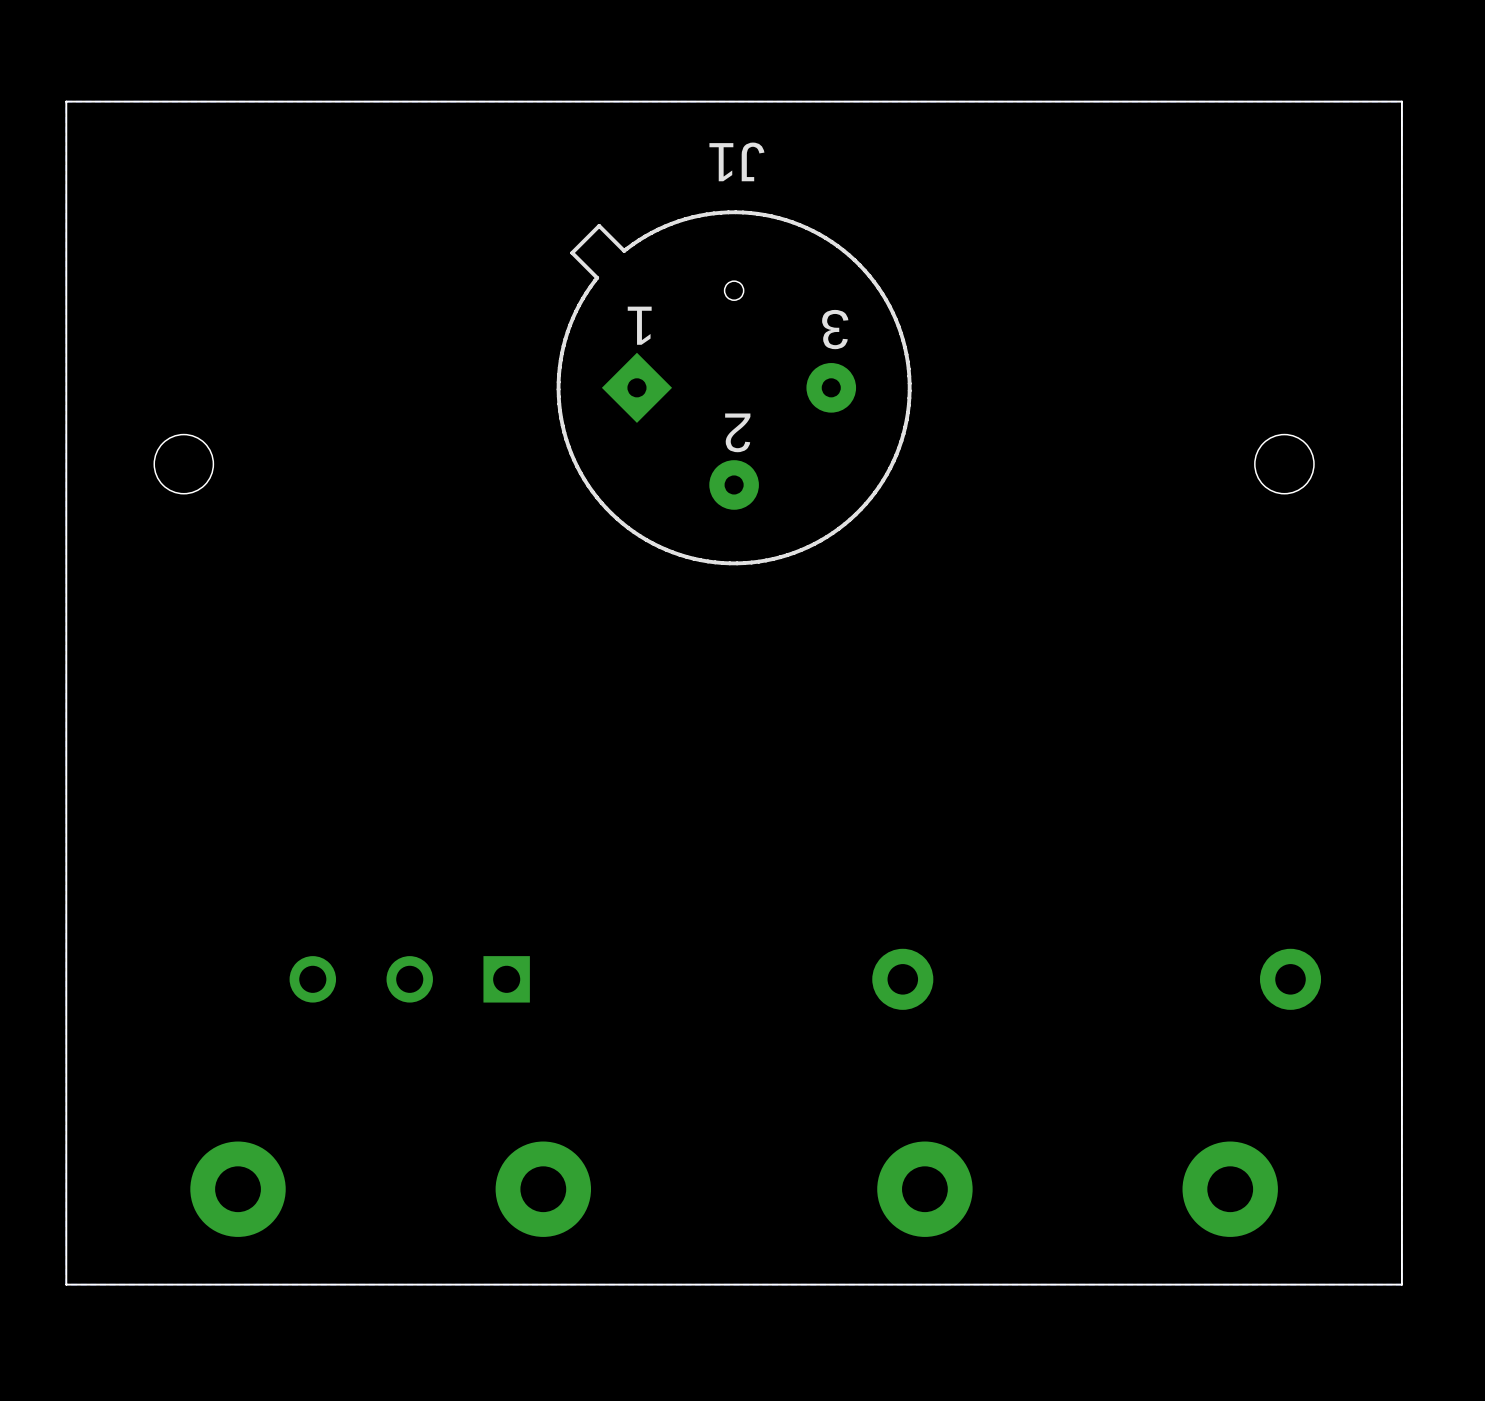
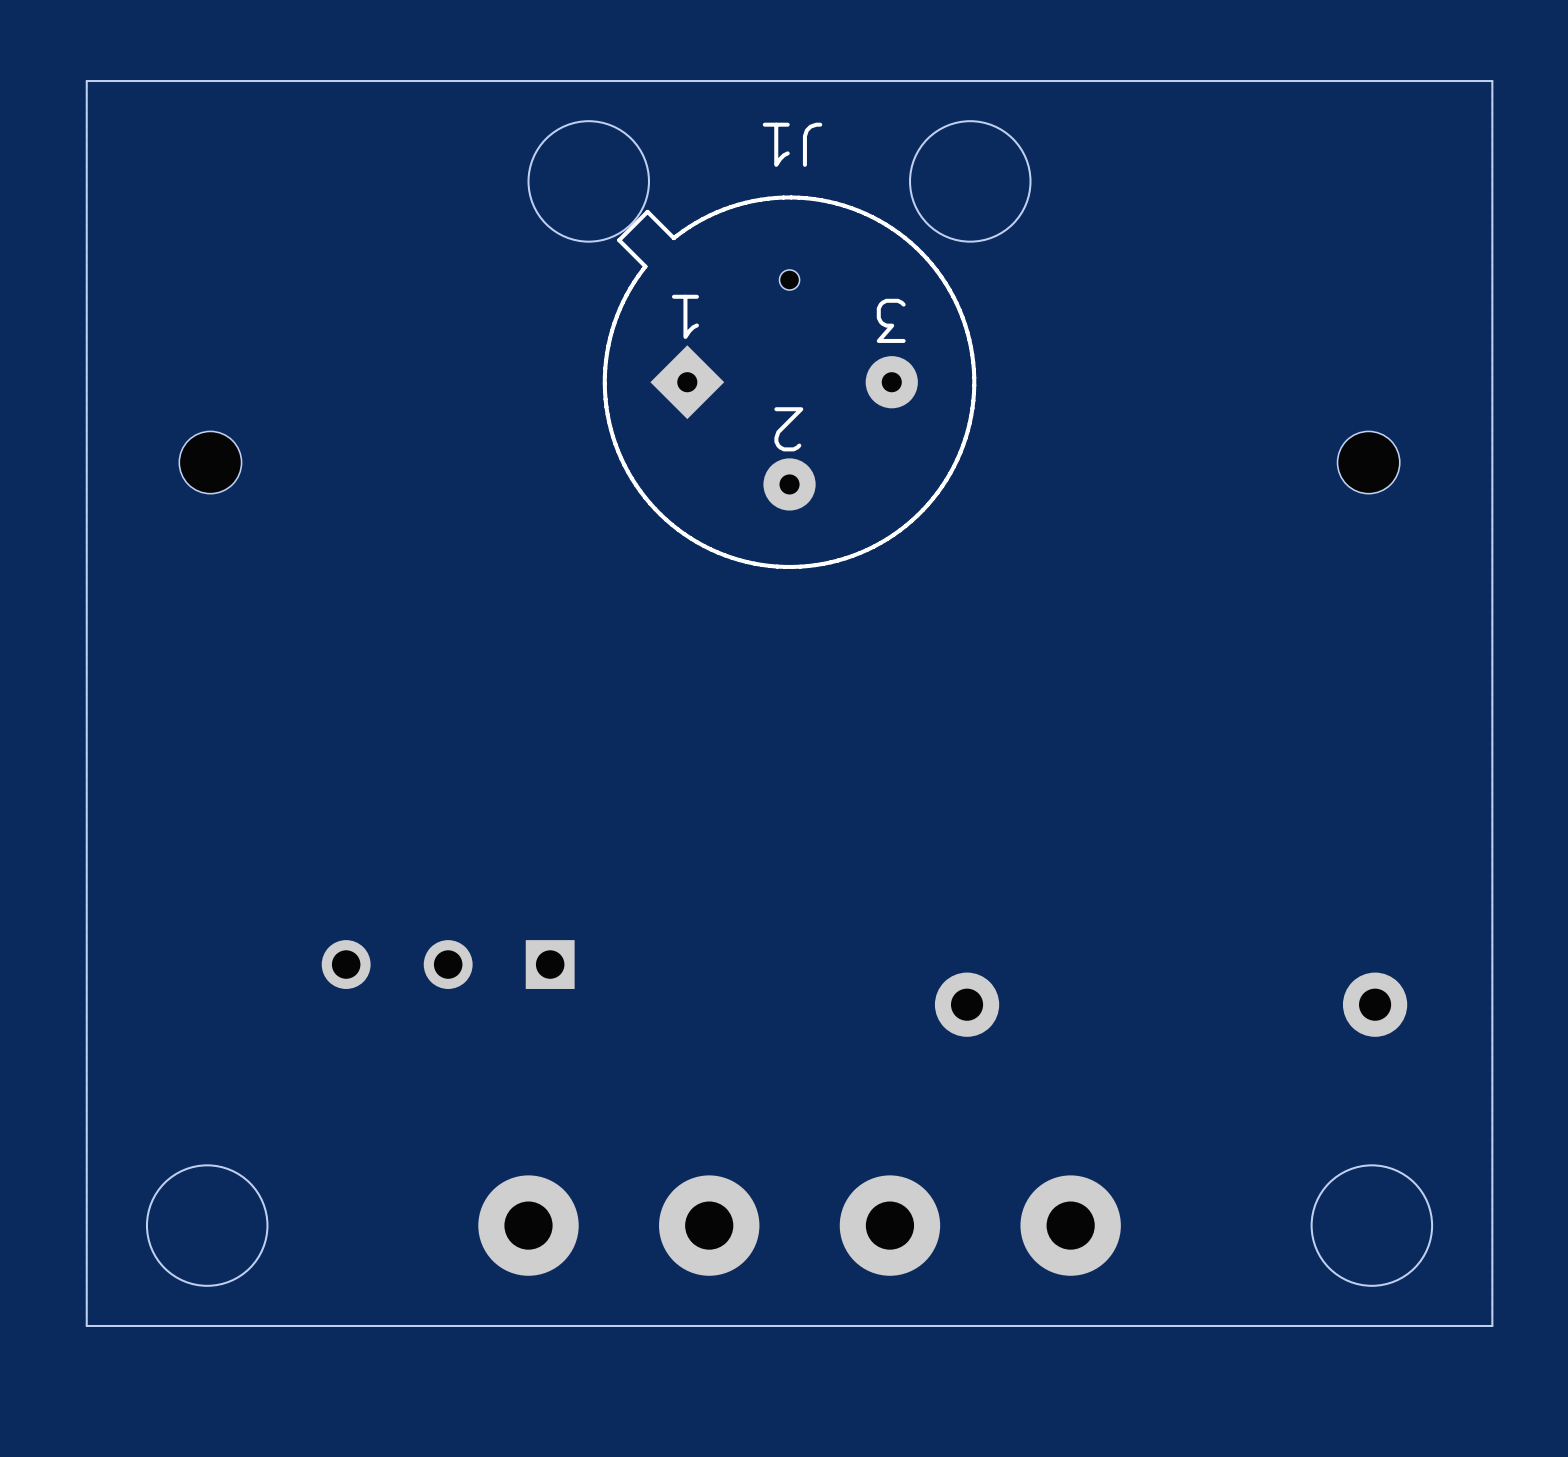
round board edge: none -> [527, 120, 650, 243]
round board edge: none -> [909, 120, 1032, 243]
part position: (409, 979) -> (448, 964)
round board edge: none -> [145, 1164, 269, 1287]
round board edge: none -> [1310, 1164, 1434, 1287]
part: (238, 1189) -> none
part: none -> (528, 1225)
part: (543, 1189) -> none
part: none -> (709, 1225)
part: none -> (889, 1225)
part: (924, 1189) -> none
part: none -> (1070, 1225)
part: (1230, 1189) -> none

